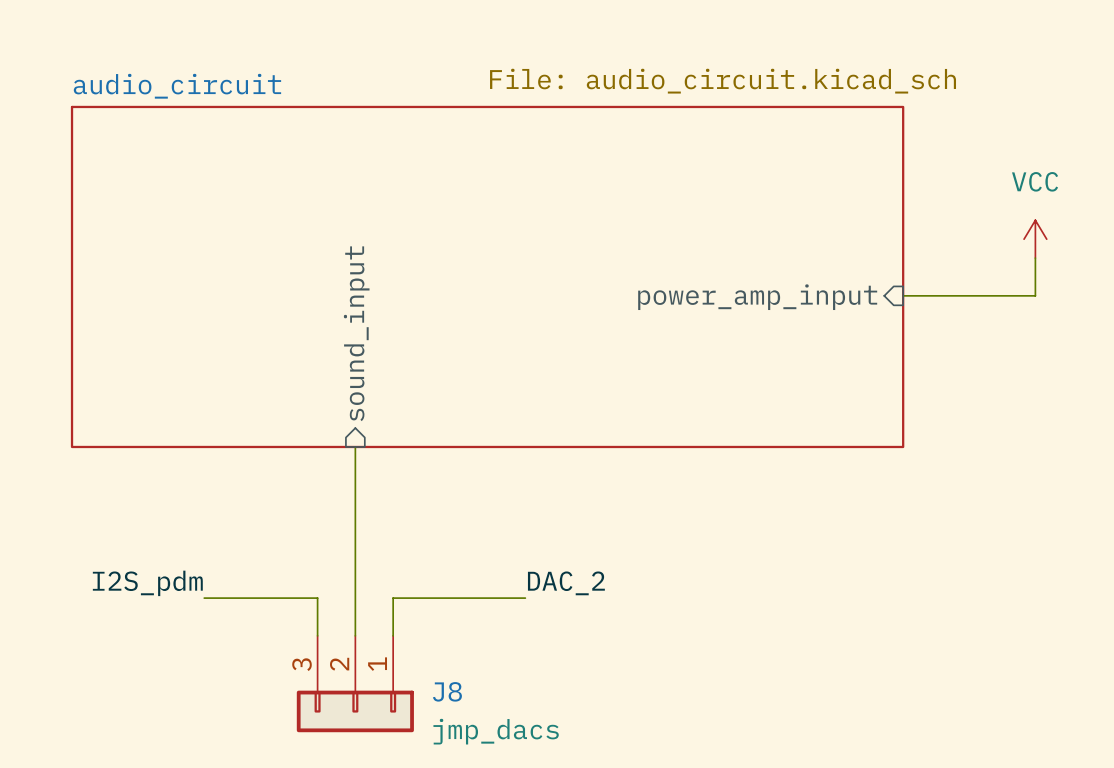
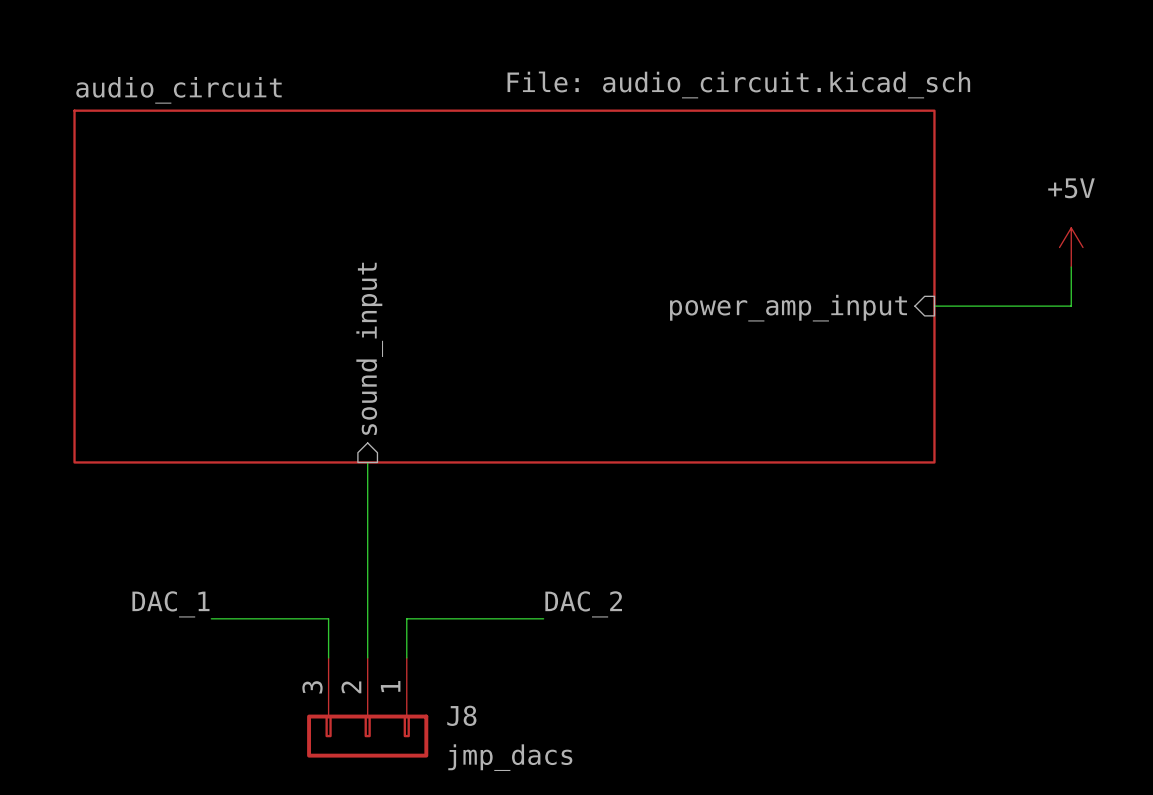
power symbol: VCC (1035, 239) -> +5V (1071, 247)
label: I2S_pdm (147, 583) -> DAC_1 (170, 604)

